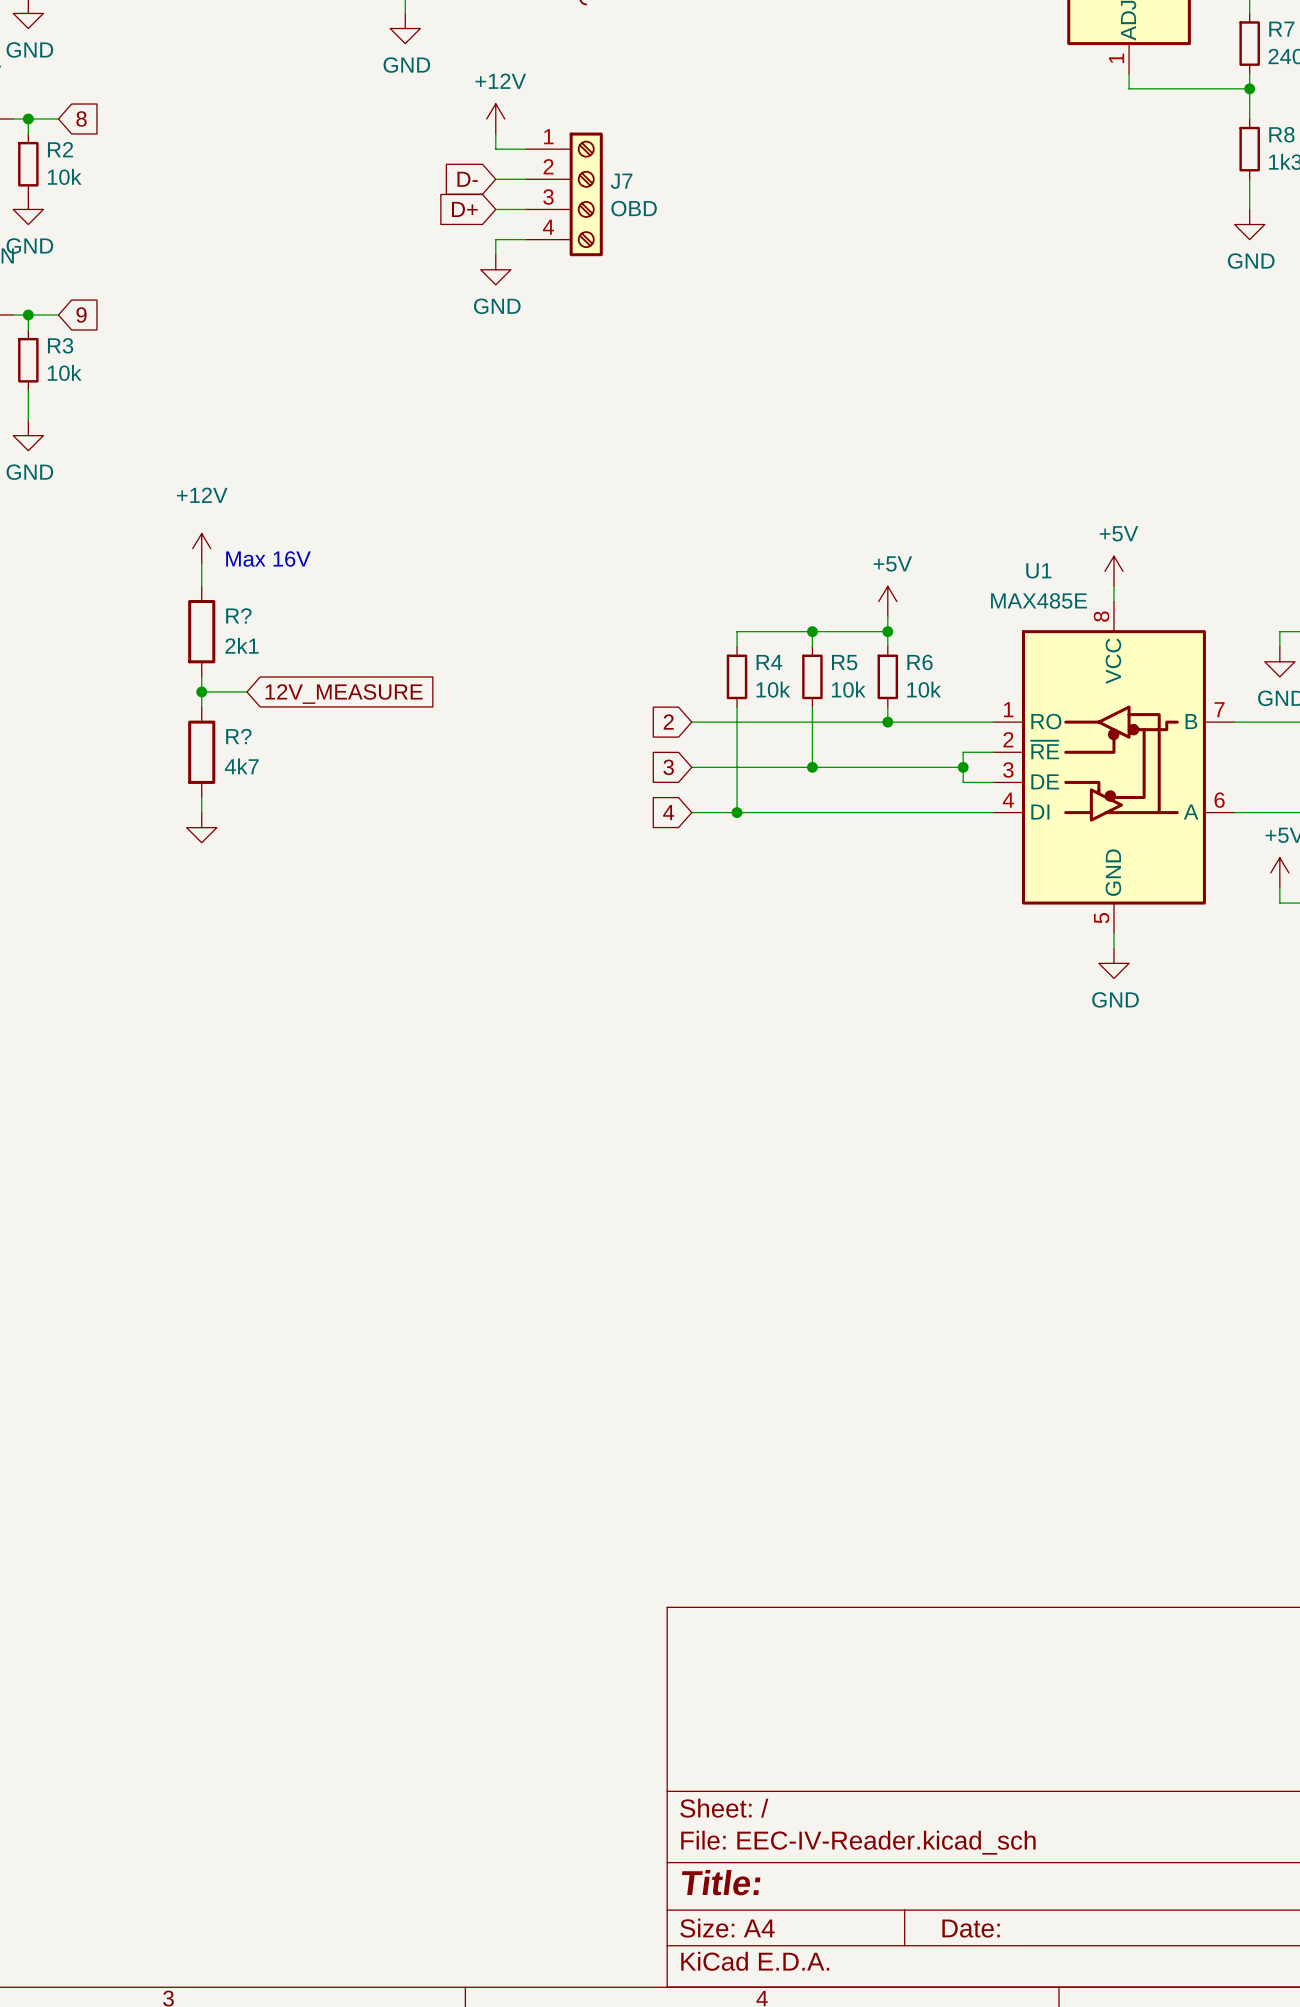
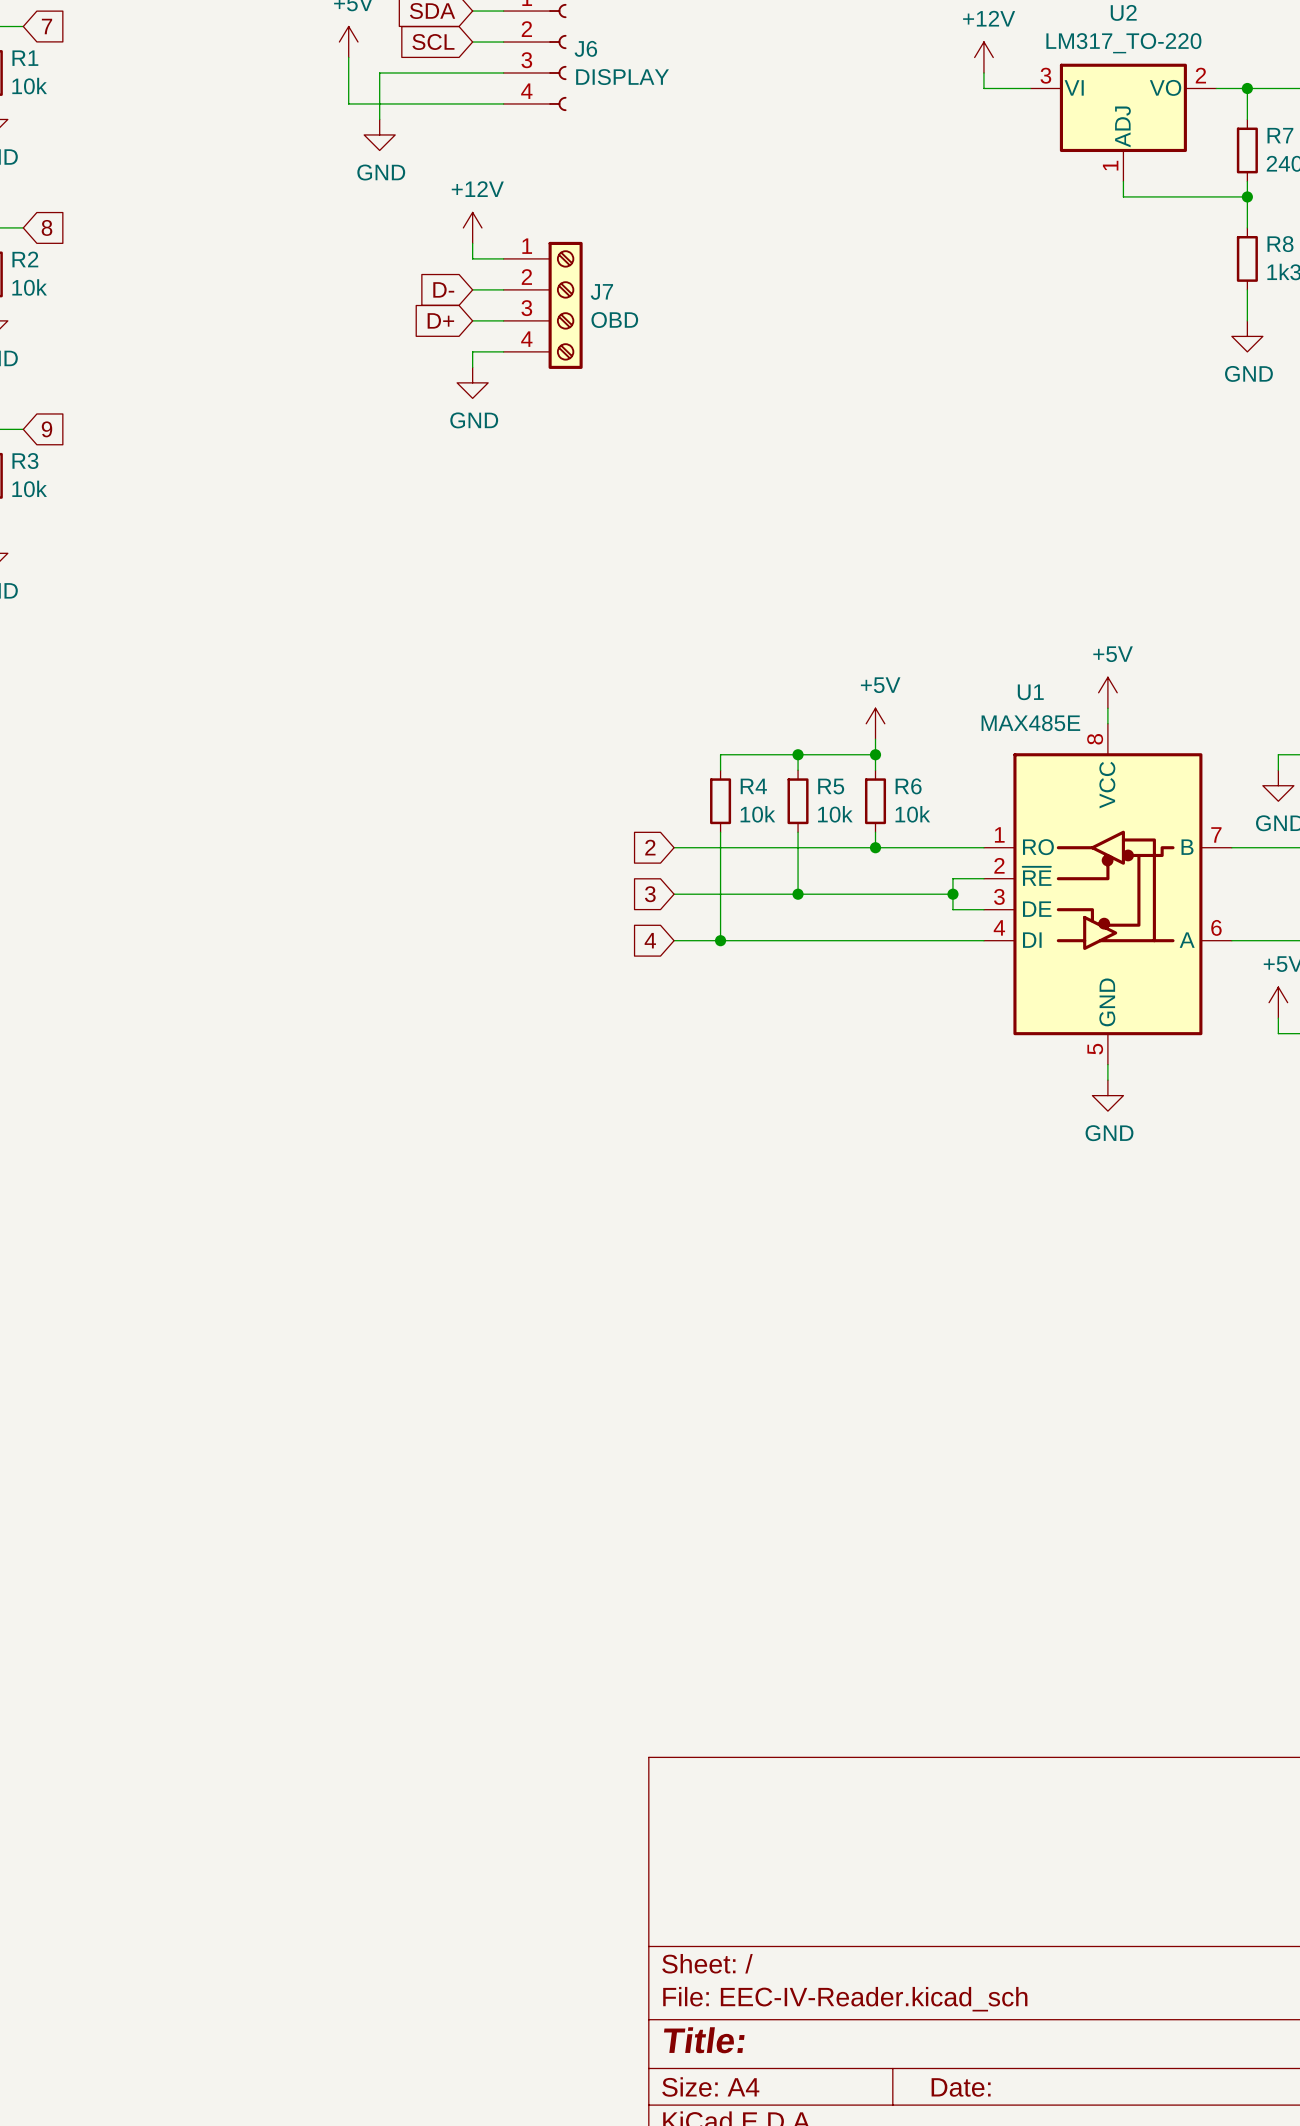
power symbol: +12V (201, 548) -> none
text: Max 16V (268, 558) -> none
wire: (201, 563) (201, 586) -> none
R?: 2k1 (201, 631) -> none
wire: (201, 676) (201, 707) -> none
wire: (201, 691) (246, 691) -> none
junction: (201, 691) -> none
global label: 12V_MEASURE (344, 694) -> none
R?: 4k7 (201, 752) -> none
wire: (201, 797) (201, 812) -> none
power symbol: (201, 827) -> none

